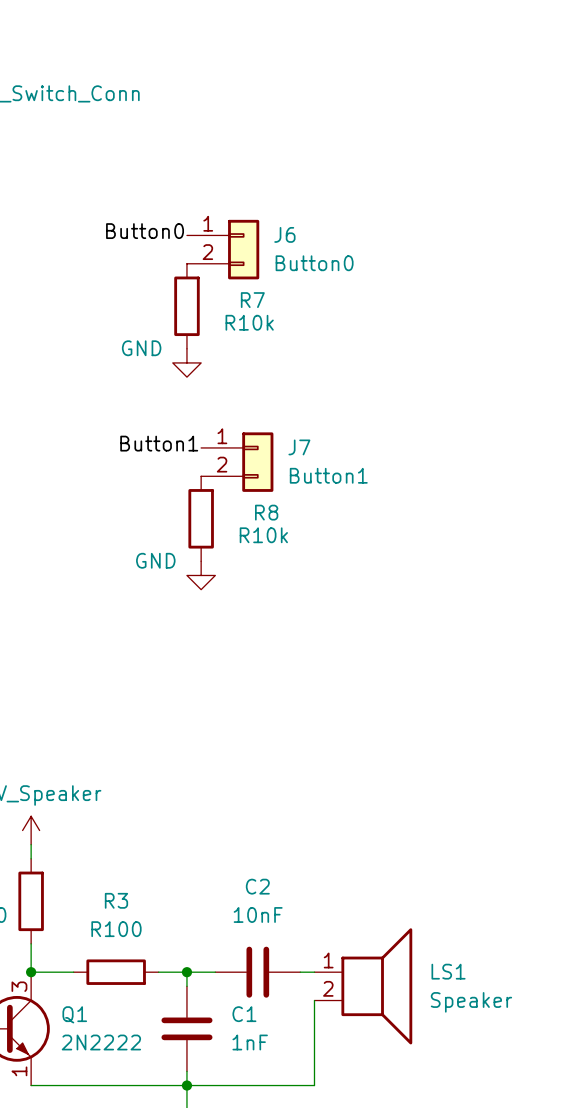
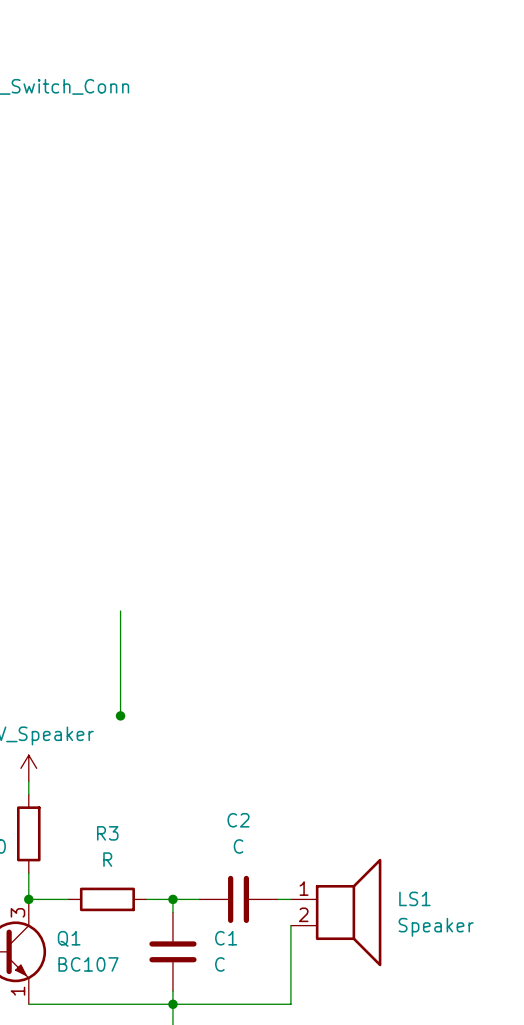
label: Button0 (145, 231) -> none
J6: Button0 (223, 249) -> none
R7: R10k (186, 306) -> none
power symbol: GND (186, 362) -> none
label: Button1 (159, 443) -> none
J7: Button1 (237, 462) -> none
R8: R10k (201, 518) -> none
power symbol: GND (201, 575) -> none
wire: none -> (120, 611) (120, 715)
junction: none -> (120, 715)
C2 value: 10nF (258, 914) -> C (238, 846)
R3 value: R100 (116, 929) -> R (107, 859)
Q1 value: 2N2222 (101, 1042) -> BC107 (88, 964)
C1 value: 1nF (250, 1042) -> C (219, 964)

